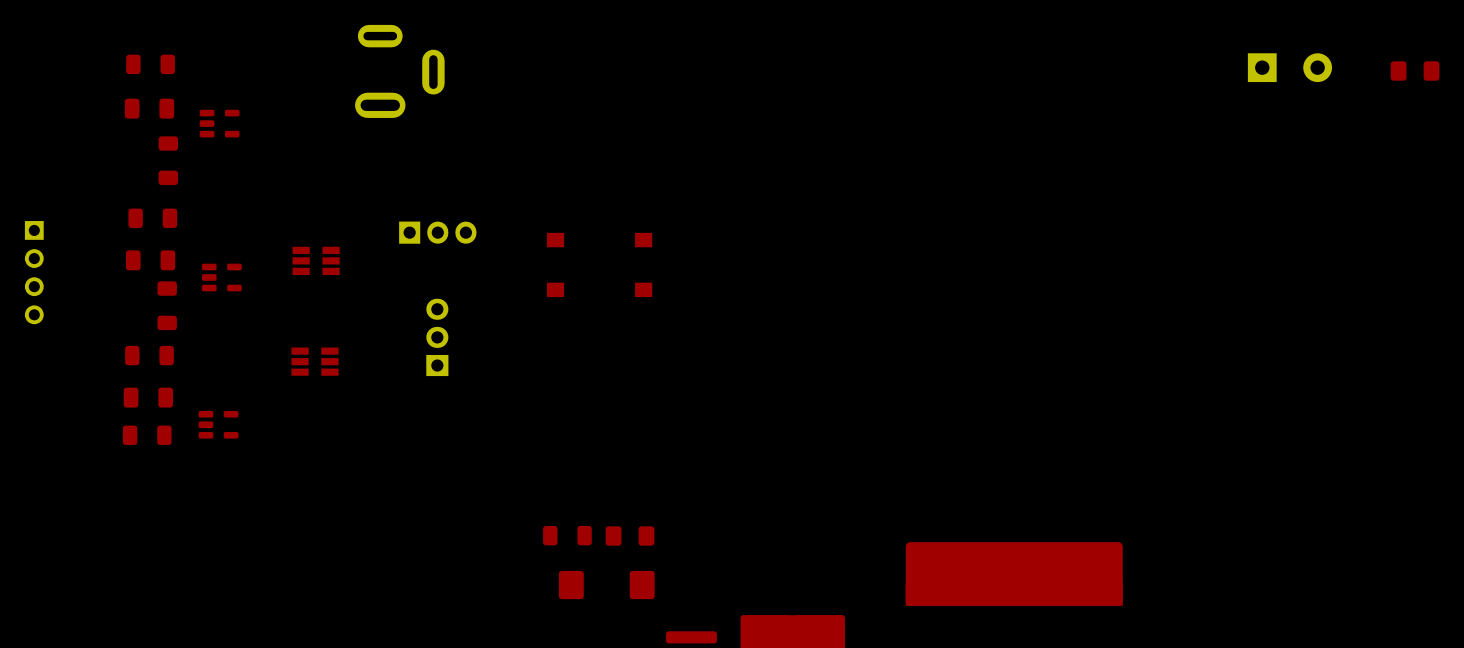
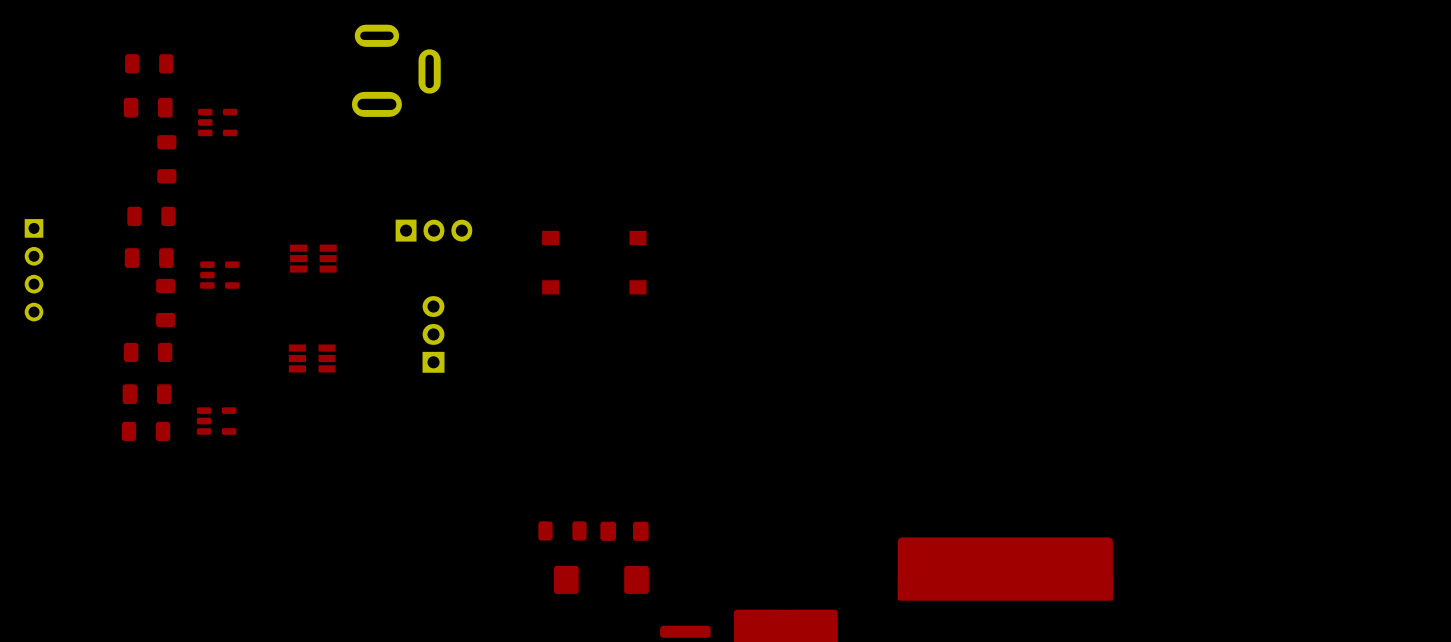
part: (1289, 67) -> none
part: (1415, 70) -> none

